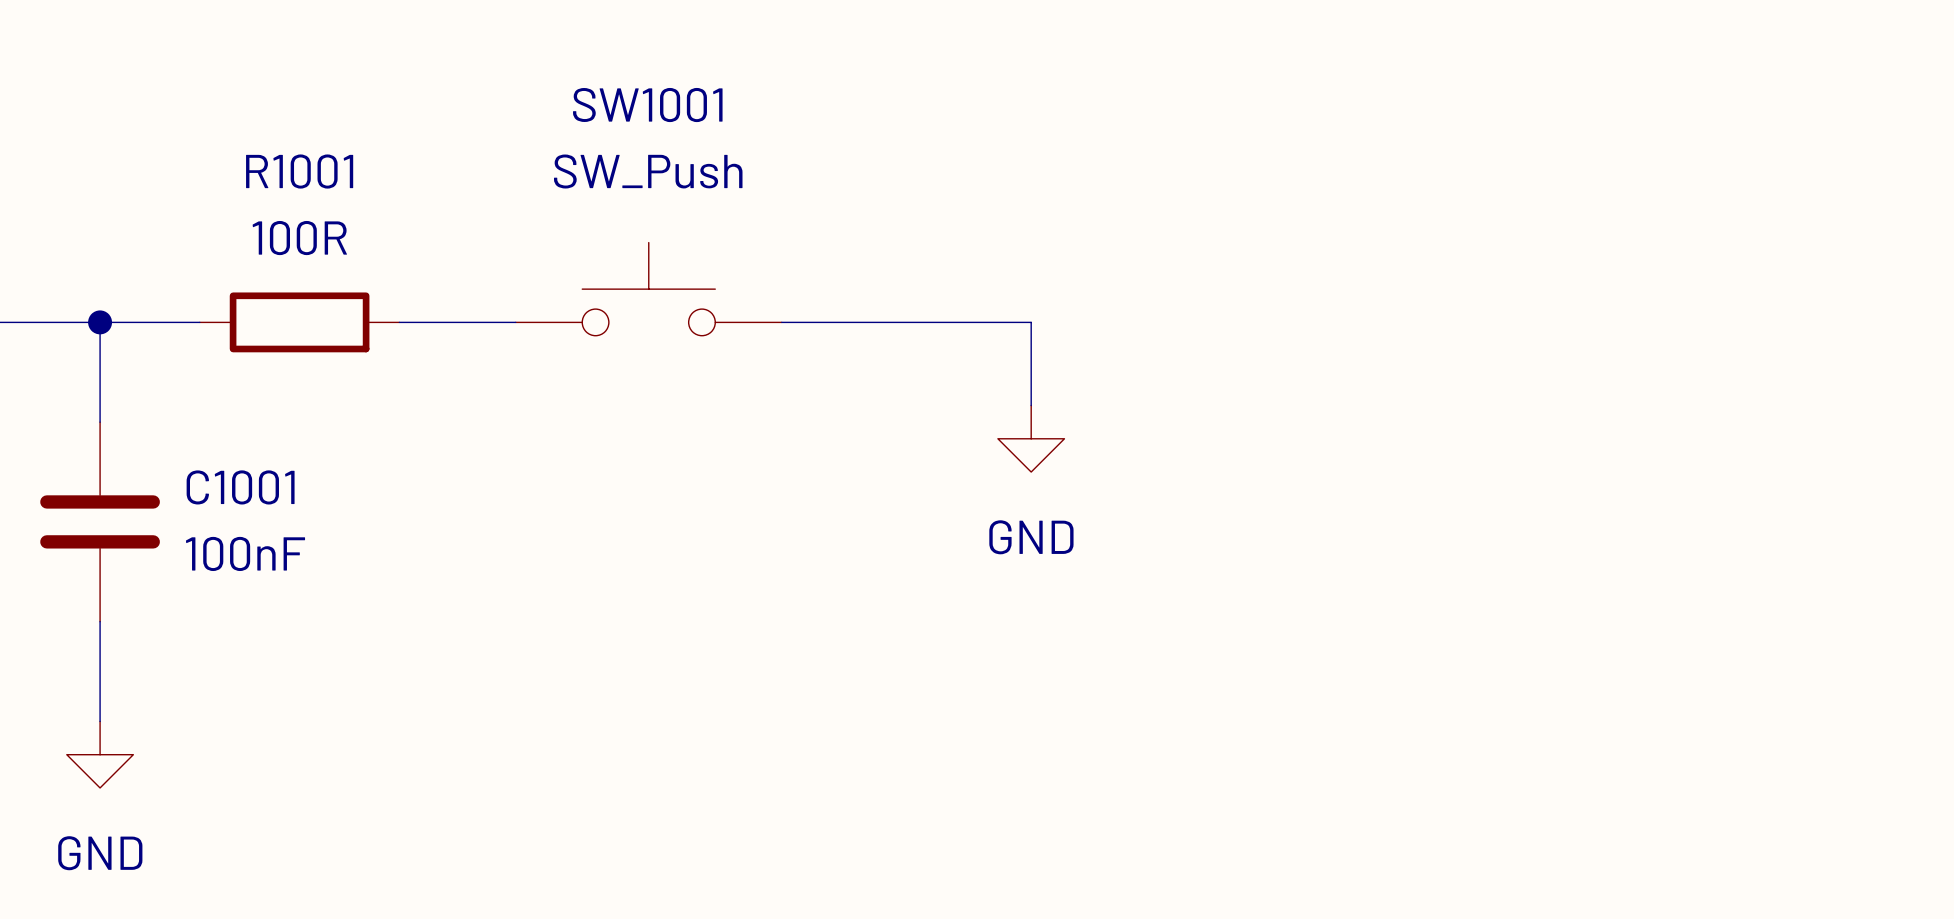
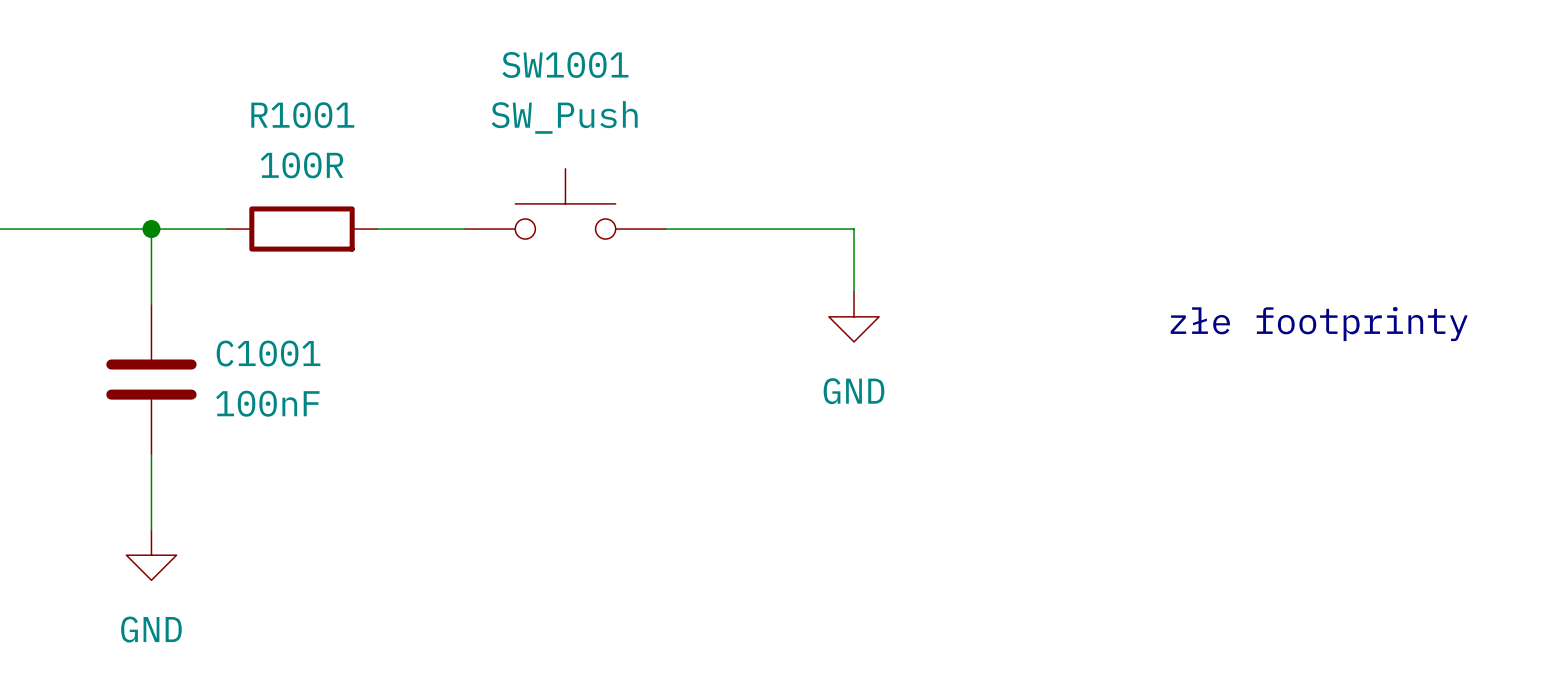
text: none -> złe footprinty (1319, 324)

